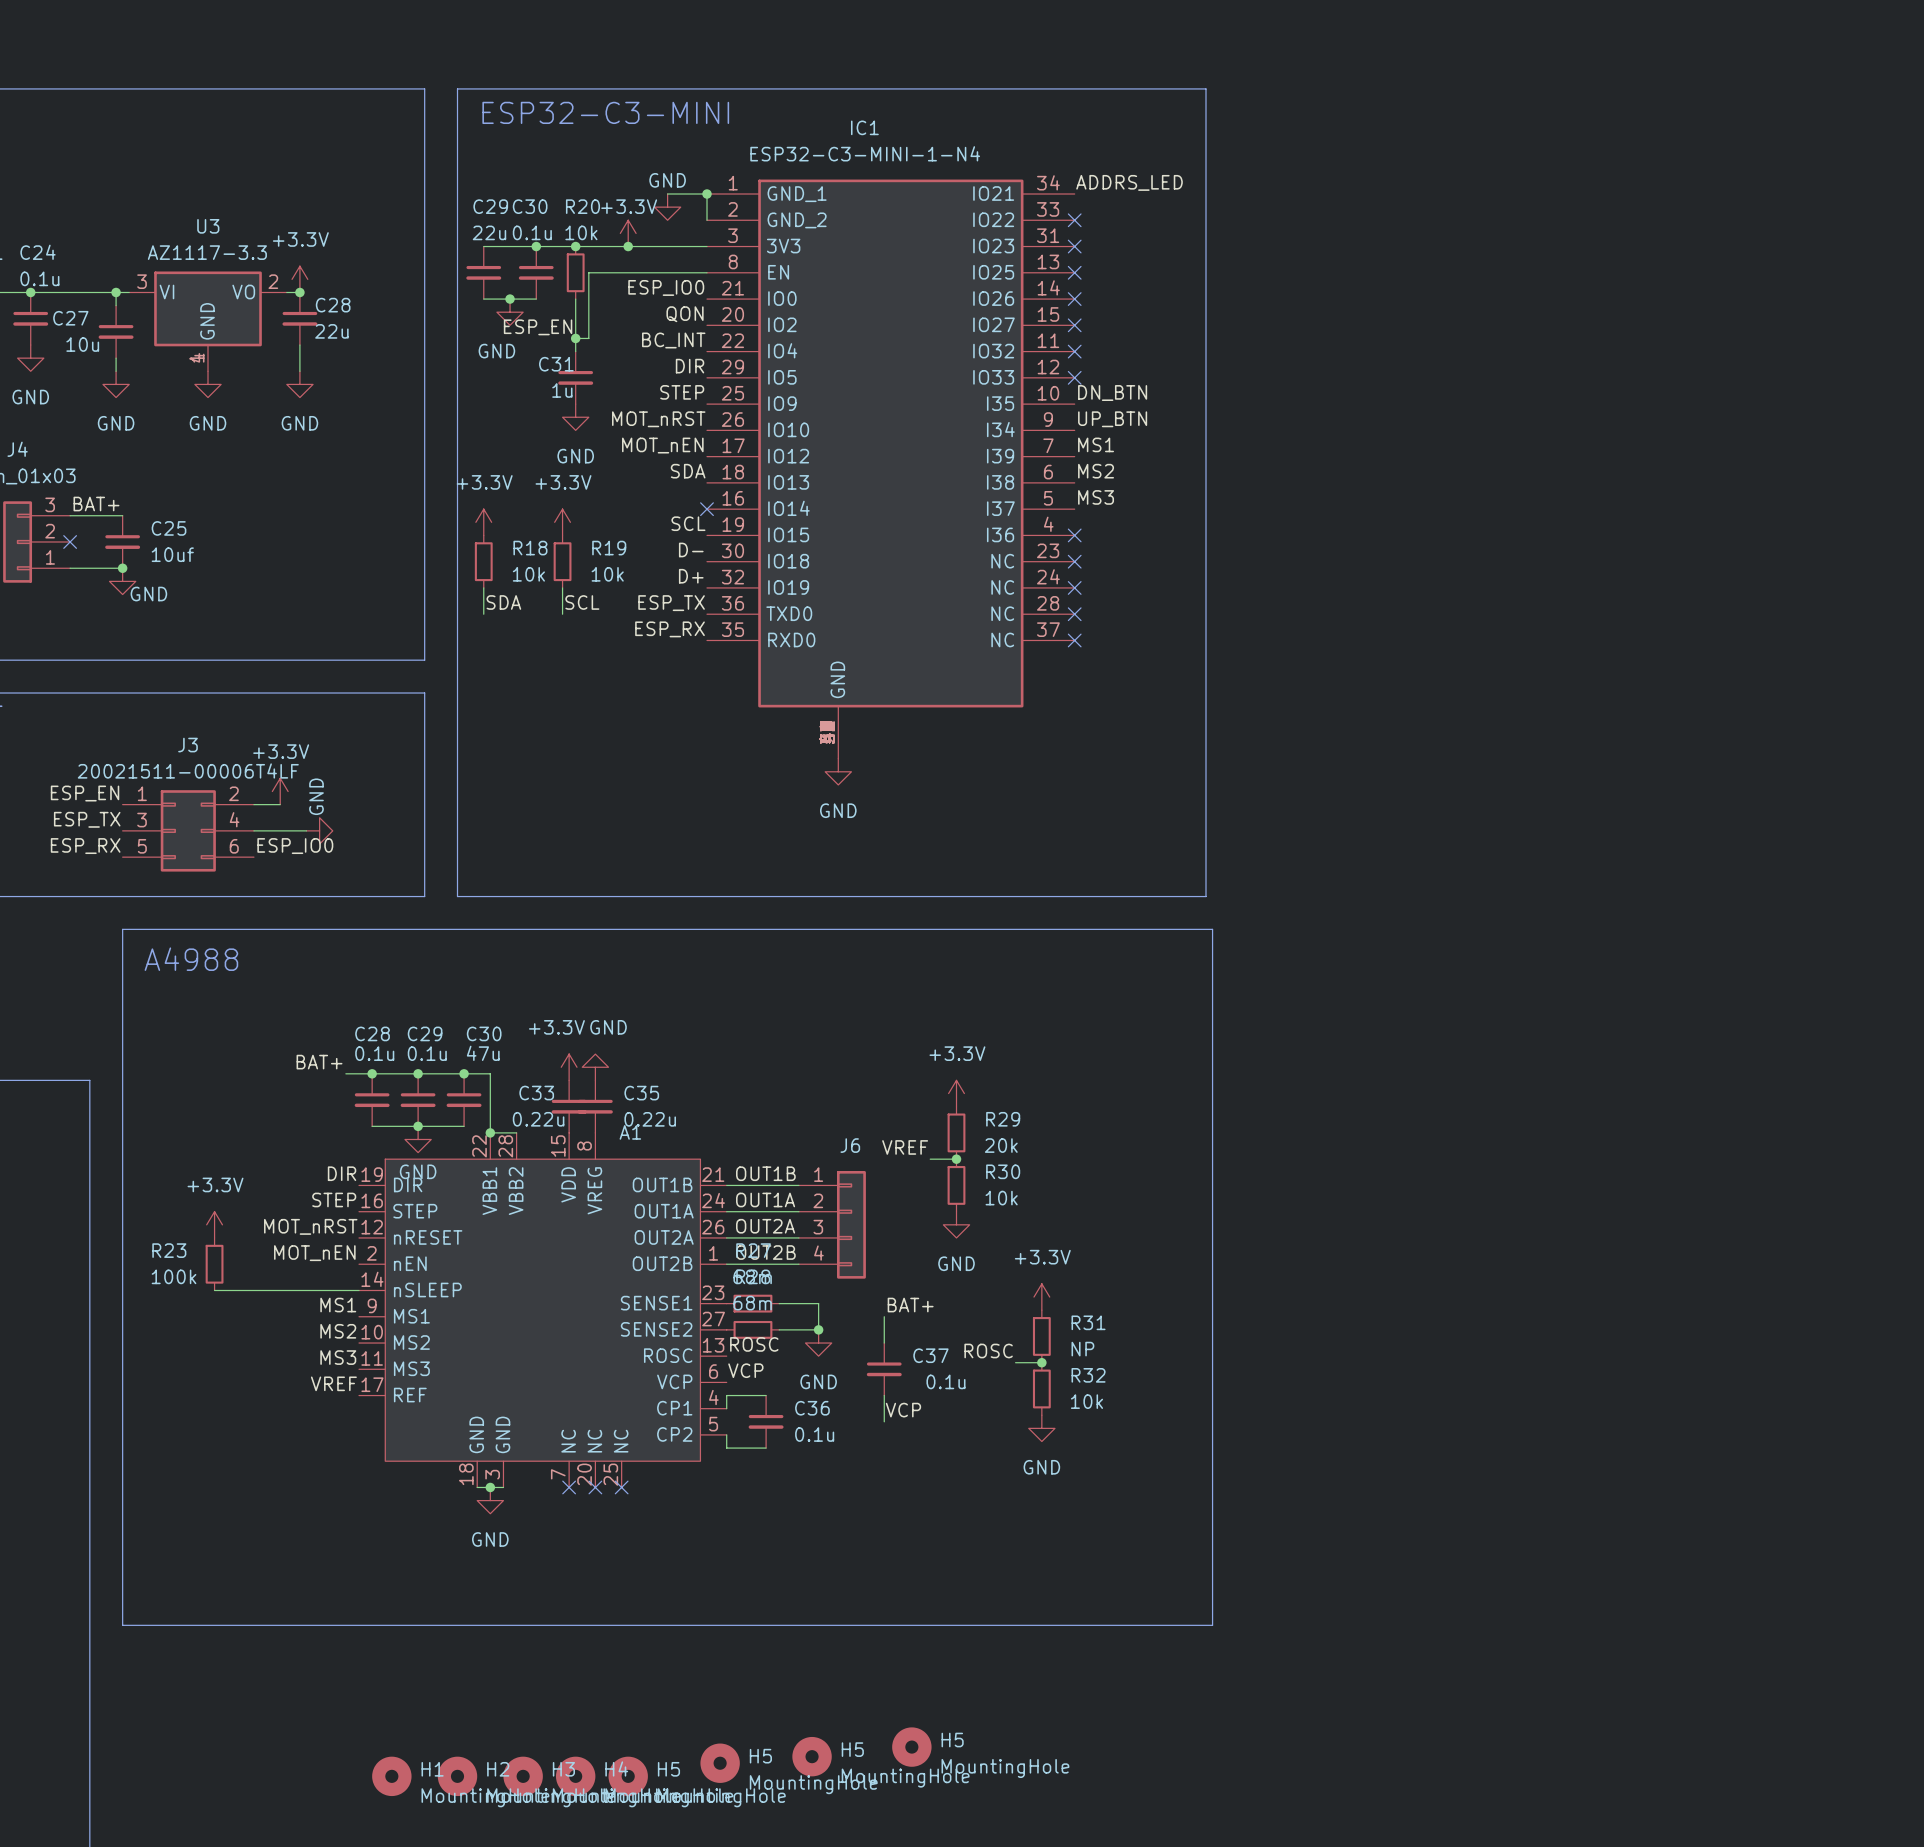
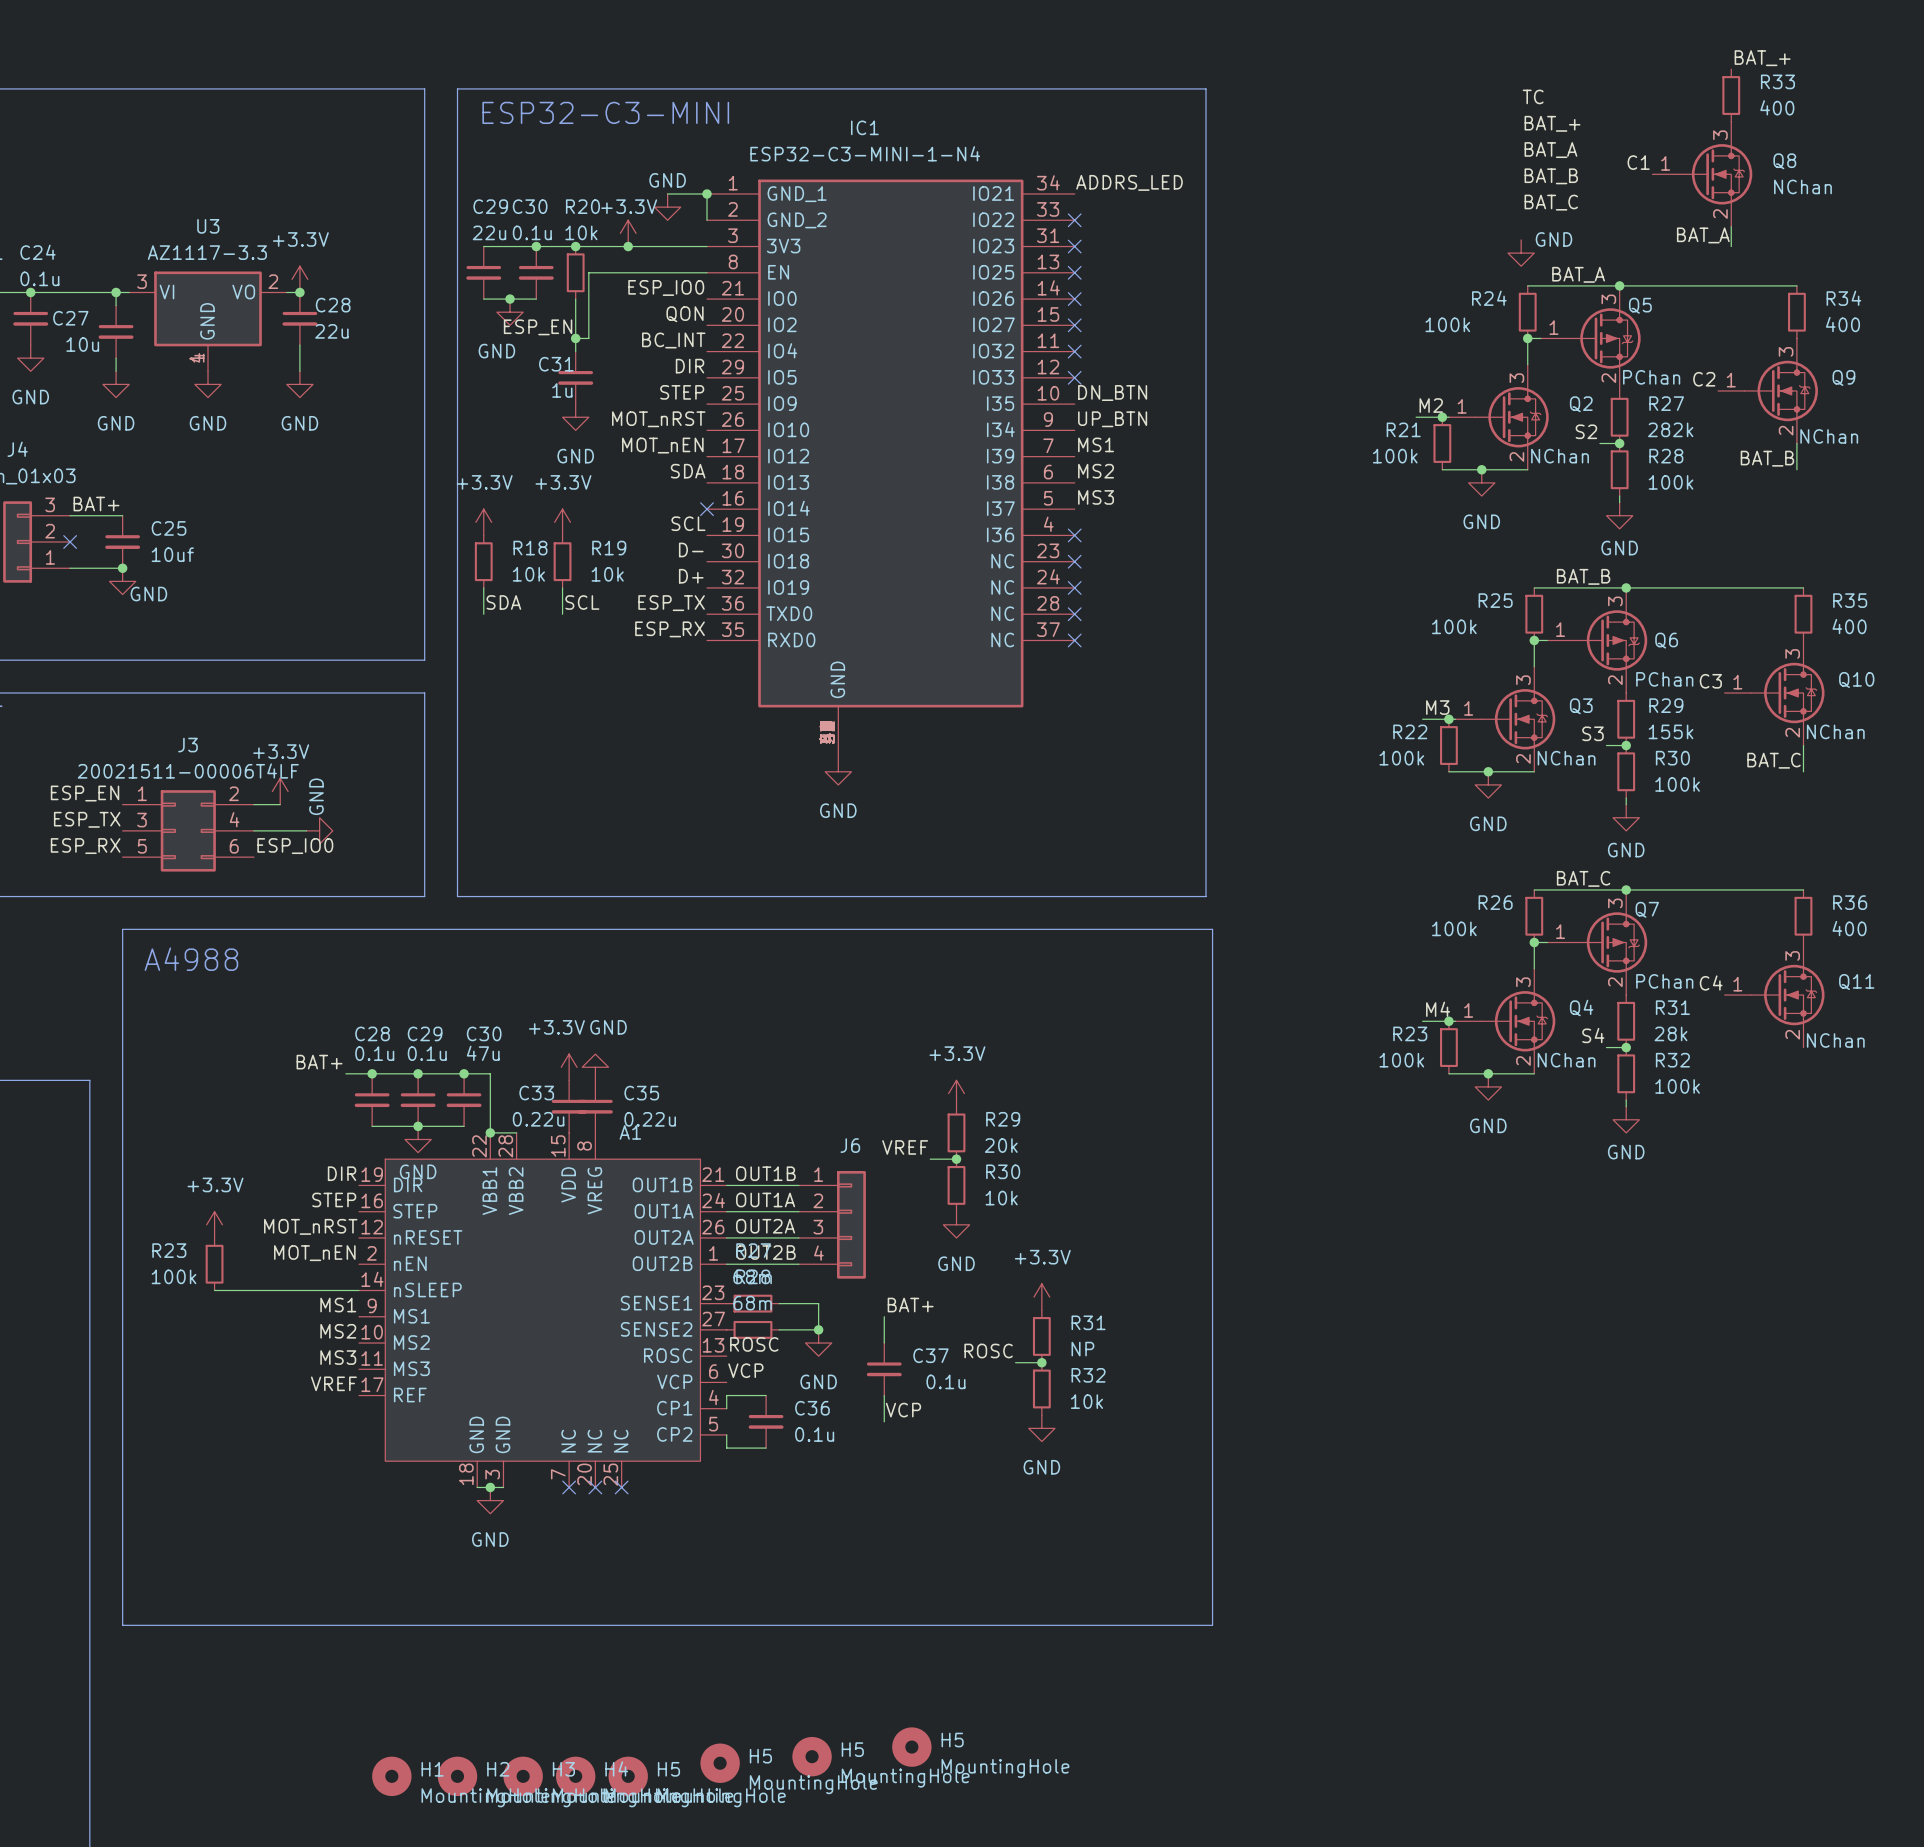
label: none -> BAT_+ (1762, 58)
R33: none -> 400 (1731, 95)
label: none -> TC (1533, 96)
label: none -> BAT_+ (1552, 123)
label: none -> BAT_A (1550, 150)
label: none -> C1 (1638, 162)
Q8: none -> NChan (1702, 174)
label: none -> BAT_B (1551, 176)
label: none -> BAT_C (1551, 202)
wire: none -> (1731, 226) (1731, 246)
label: none -> BAT_A (1703, 235)
power symbol: none -> GND (1521, 253)
label: none -> BAT_A (1578, 274)
wire: none -> (1527, 285) (1796, 285)
junction: none -> (1619, 285)
R24: none -> 100k (1527, 312)
R34: none -> 400 (1796, 312)
junction: none -> (1527, 338)
wire: none -> (1540, 338) (1527, 338) (1527, 364)
Q5: none -> PChan (1590, 338)
label: none -> C2 (1704, 379)
Q9: none -> NChan (1768, 390)
label: none -> M2 (1431, 405)
wire: none -> (1416, 417) (1448, 417)
junction: none -> (1442, 417)
Q2: none -> NChan (1498, 417)
R27: none -> 282k (1619, 417)
label: none -> S2 (1586, 431)
R21: none -> 100k (1442, 443)
wire: none -> (1599, 443) (1619, 443)
junction: none -> (1619, 443)
wire: none -> (1796, 443) (1796, 469)
label: none -> BAT_B (1767, 458)
wire: none -> (1442, 469) (1527, 469)
junction: none -> (1481, 469)
R28: none -> 100k (1619, 469)
power symbol: none -> GND (1481, 482)
wire: none -> (1619, 496) (1619, 502)
power symbol: none -> GND (1619, 515)
label: none -> BAT_B (1583, 576)
wire: none -> (1534, 587) (1803, 587)
junction: none -> (1626, 587)
R25: none -> 100k (1534, 614)
R35: none -> 400 (1803, 614)
junction: none -> (1534, 640)
wire: none -> (1547, 640) (1534, 640) (1534, 666)
Q6: none -> PChan (1597, 640)
label: none -> C3 (1710, 681)
Q10: none -> NChan (1774, 693)
label: none -> M3 (1437, 707)
wire: none -> (1422, 719) (1455, 719)
junction: none -> (1448, 719)
Q3: none -> NChan (1505, 719)
R29: none -> 155k (1626, 719)
label: none -> S3 (1592, 733)
R22: none -> 100k (1448, 745)
wire: none -> (1606, 745) (1626, 745)
junction: none -> (1626, 745)
wire: none -> (1803, 745) (1803, 771)
label: none -> BAT_C (1774, 760)
wire: none -> (1448, 771) (1534, 771)
junction: none -> (1488, 771)
R30: none -> 100k (1626, 771)
power symbol: none -> GND (1488, 784)
wire: none -> (1626, 798) (1626, 804)
power symbol: none -> GND (1626, 817)
label: none -> BAT_C (1583, 878)
wire: none -> (1534, 889) (1803, 889)
junction: none -> (1626, 889)
R26: none -> 100k (1534, 916)
R36: none -> 400 (1803, 916)
junction: none -> (1534, 942)
wire: none -> (1547, 942) (1534, 942) (1534, 968)
Q7: none -> PChan (1597, 942)
label: none -> C4 (1711, 983)
Q11: none -> NChan (1774, 995)
label: none -> M4 (1438, 1009)
wire: none -> (1422, 1021) (1455, 1021)
junction: none -> (1448, 1021)
Q4: none -> NChan (1505, 1021)
R31: none -> 28k (1626, 1021)
label: none -> S4 (1593, 1035)
R23: none -> 100k (1448, 1047)
wire: none -> (1606, 1047) (1626, 1047)
junction: none -> (1626, 1047)
wire: none -> (1448, 1073) (1534, 1073)
junction: none -> (1488, 1073)
R32: none -> 100k (1626, 1073)
power symbol: none -> GND (1488, 1086)
wire: none -> (1626, 1100) (1626, 1106)
power symbol: none -> GND (1626, 1119)

